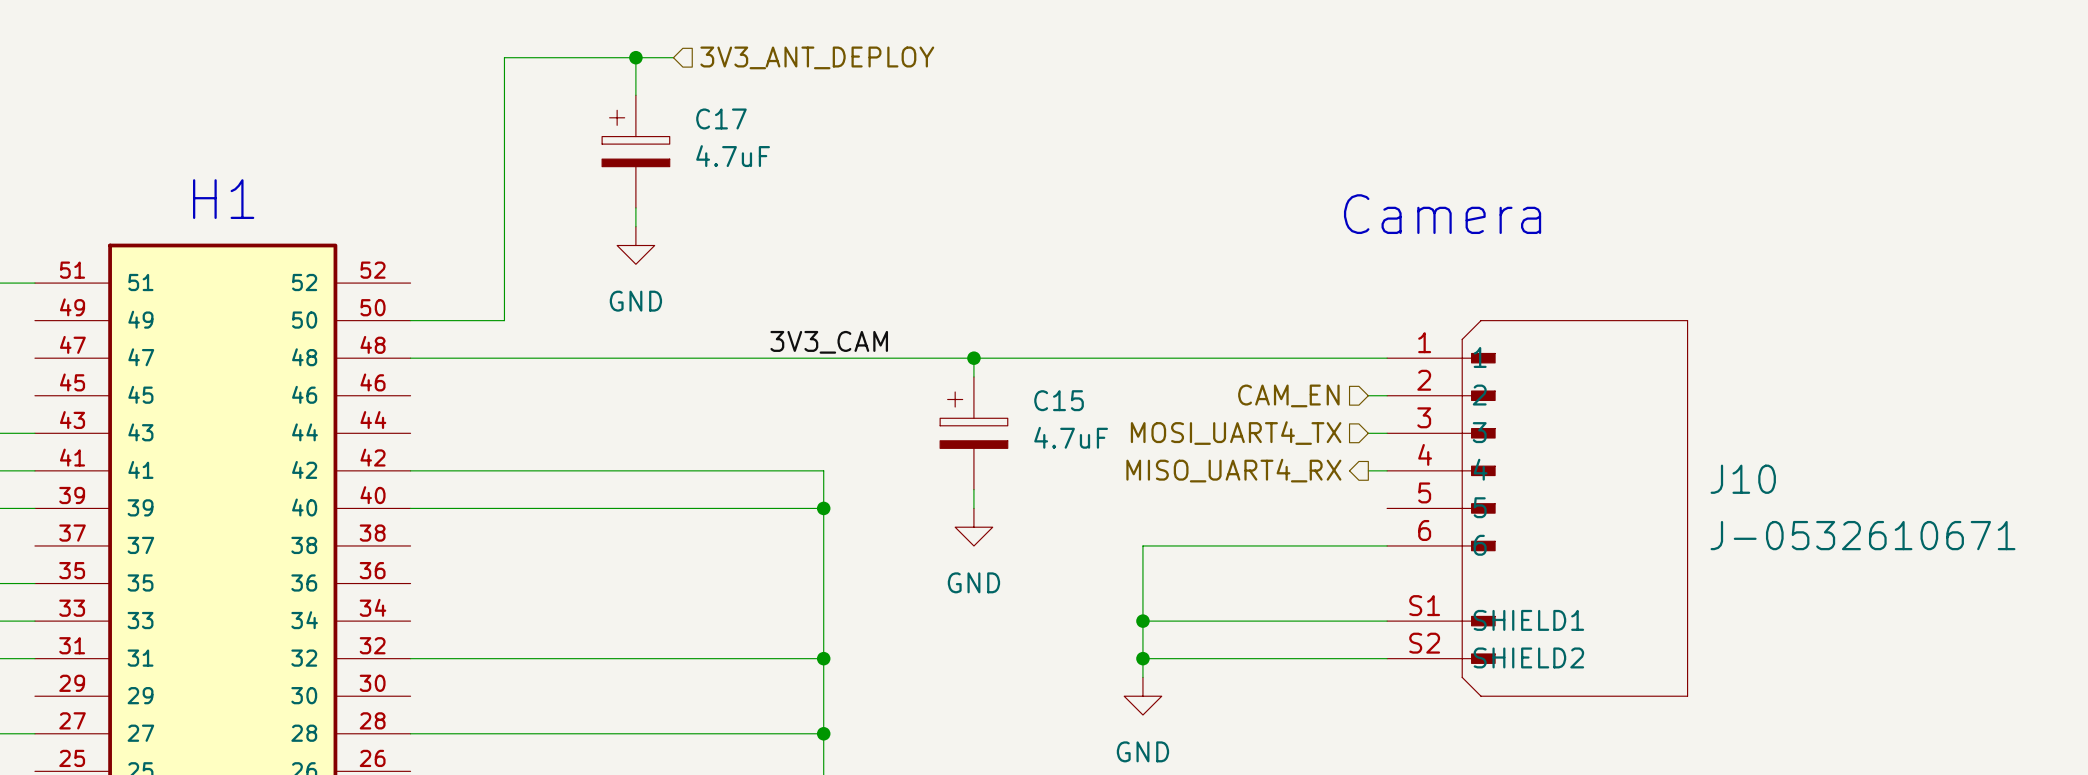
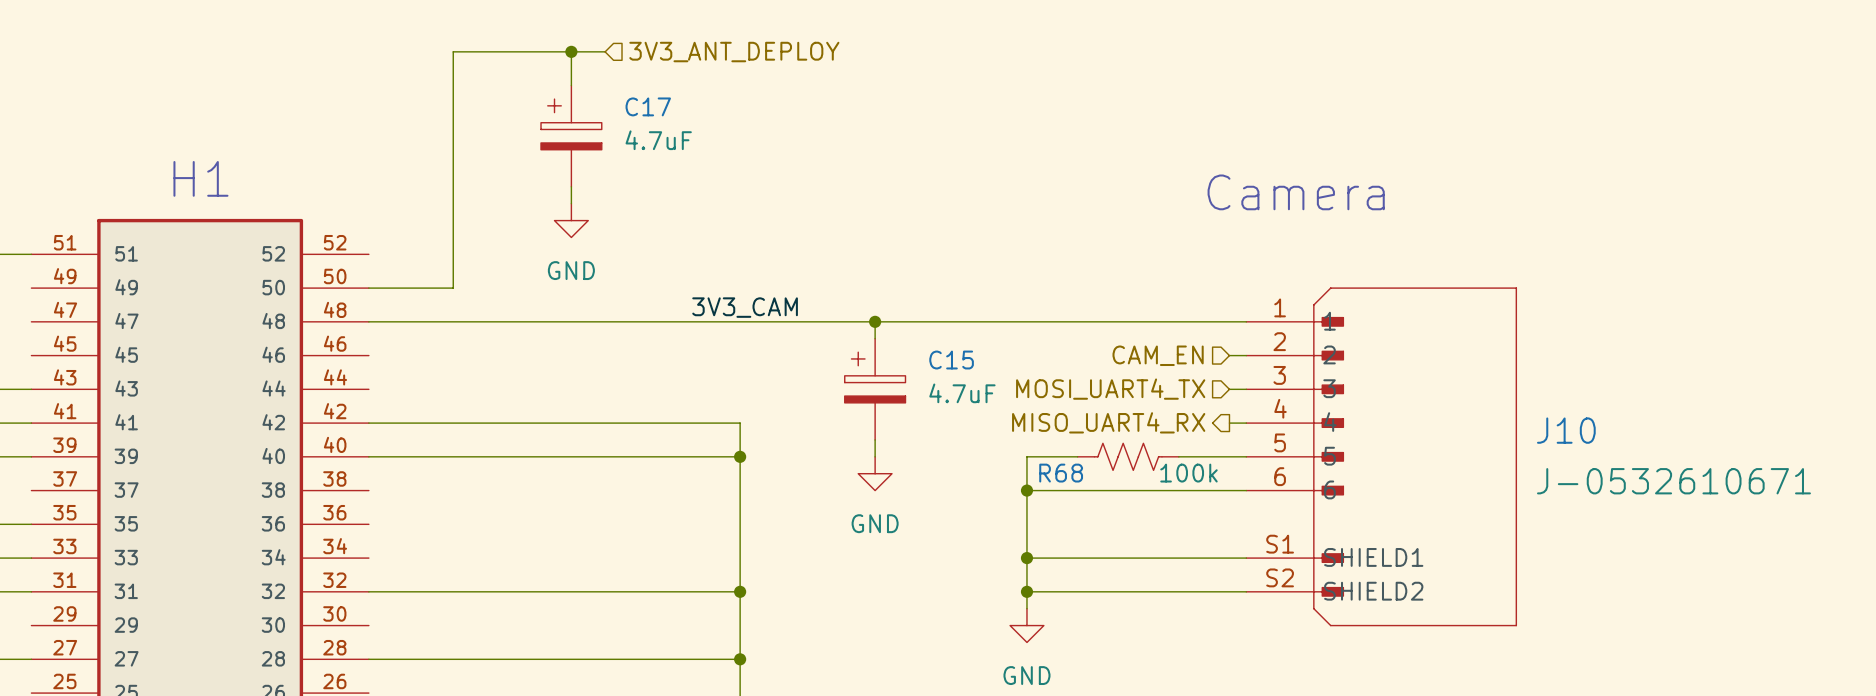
wire: none -> (1077, 456) (1026, 456) (1026, 490)
R68: none -> 100k (1128, 456)
wire: none -> (1178, 456) (1246, 456)
junction: none -> (1026, 490)

